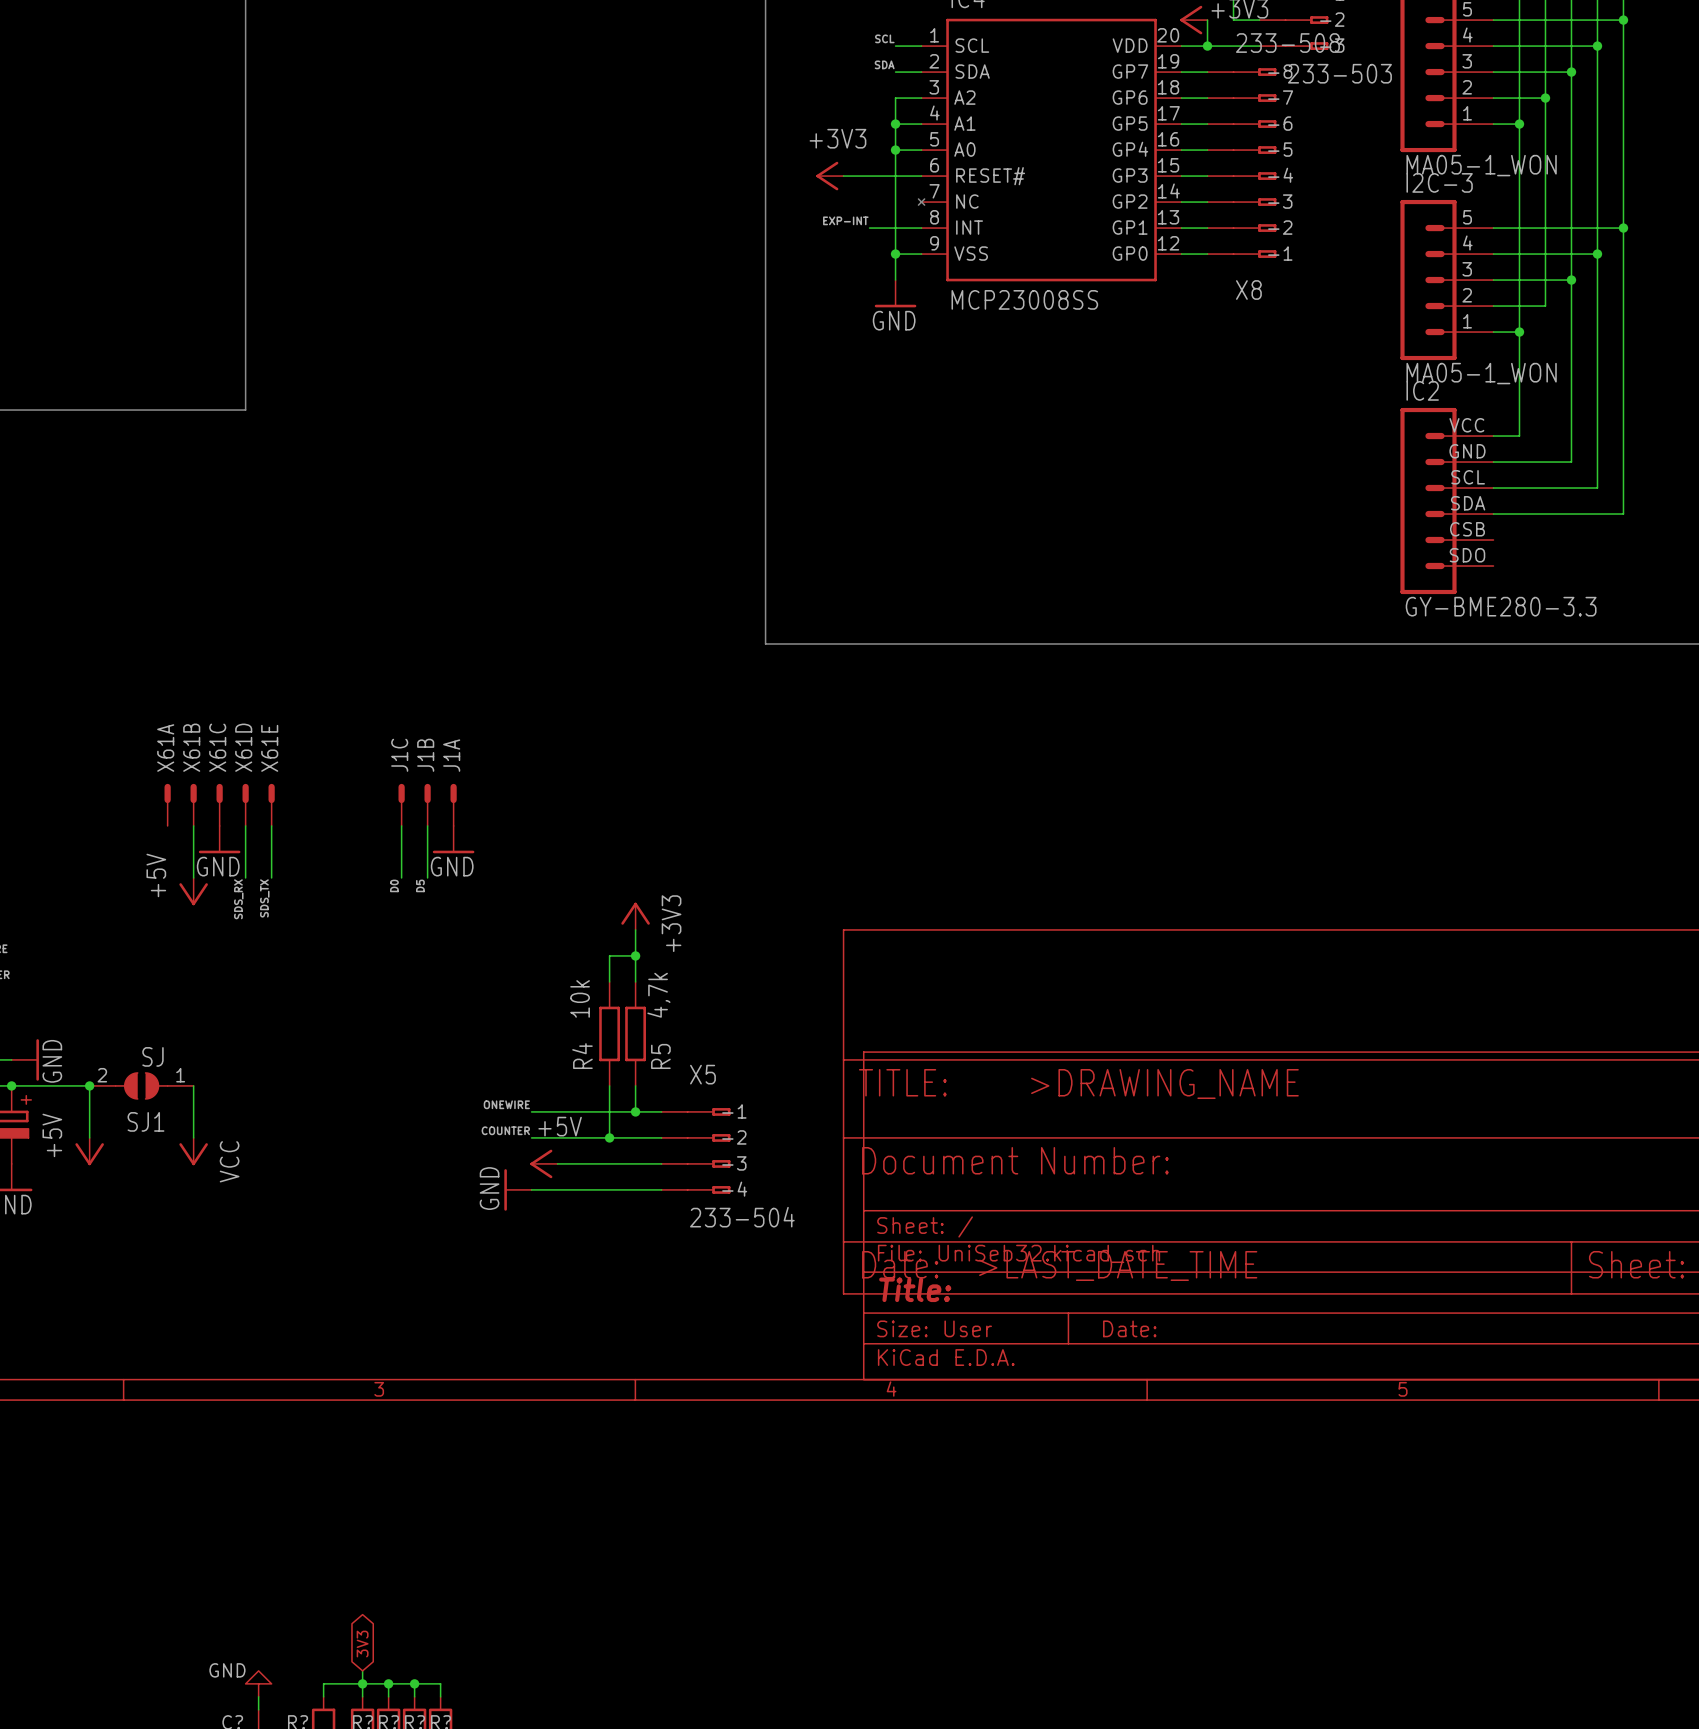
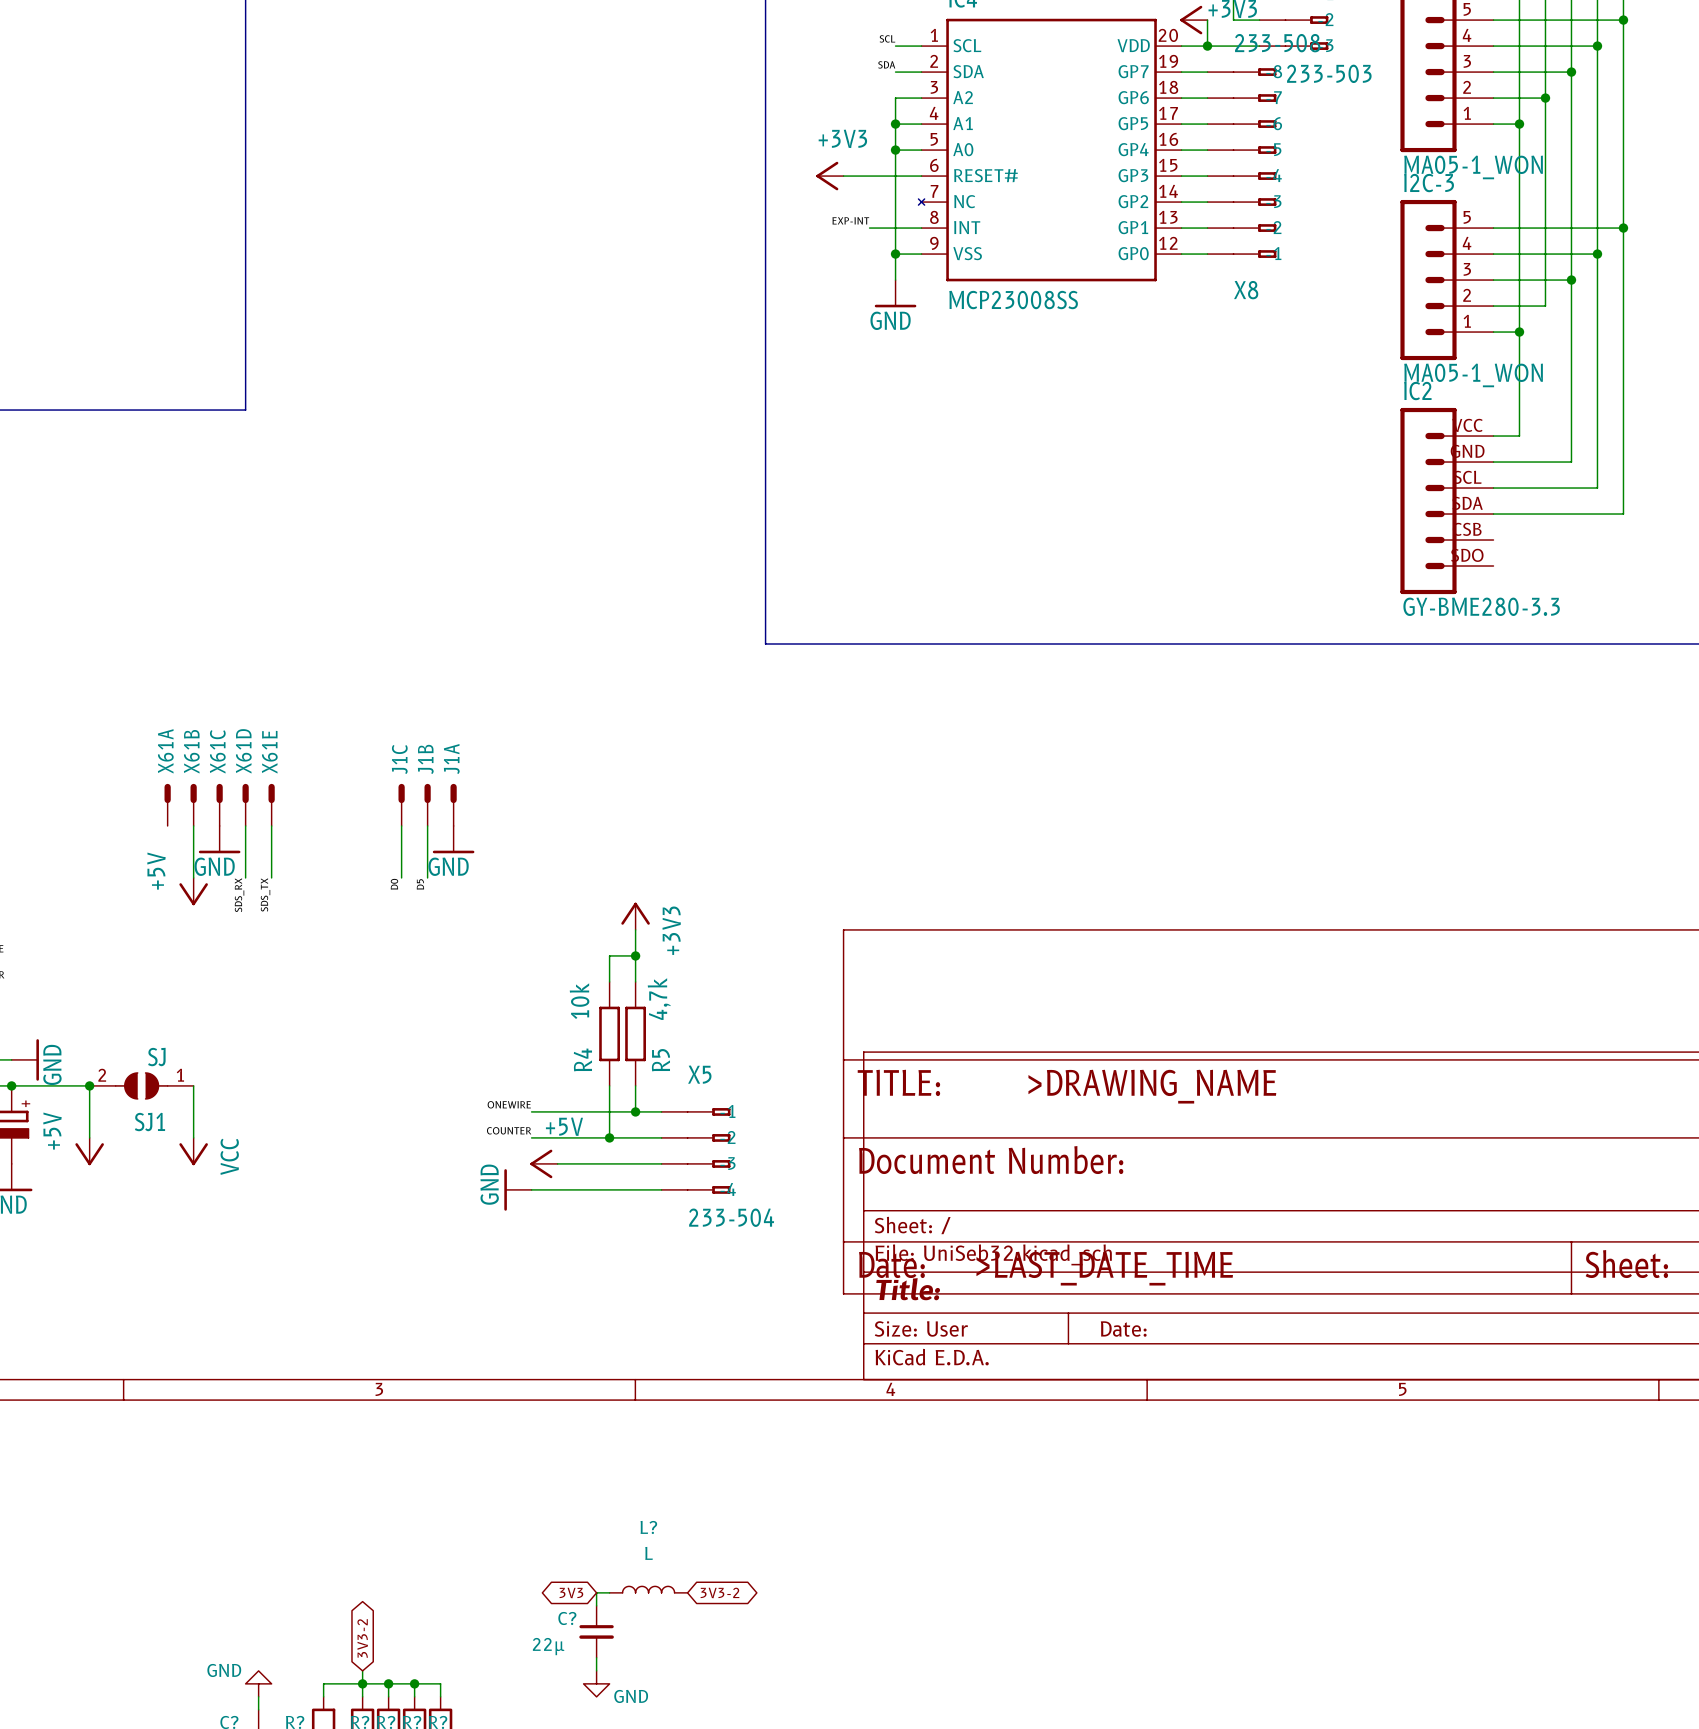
L?: none -> L (648, 1589)
global label: none -> 3V3 (571, 1592)
wire: none -> (609, 1592) (596, 1592) (596, 1605)
global label: none -> 3V3-2 (719, 1592)
C?: none -> 22µ (596, 1631)
global label: 3V3 (362, 1644) -> 3V3-2 (362, 1638)
wire: none -> (596, 1657) (596, 1670)
power symbol: none -> GND (596, 1683)

